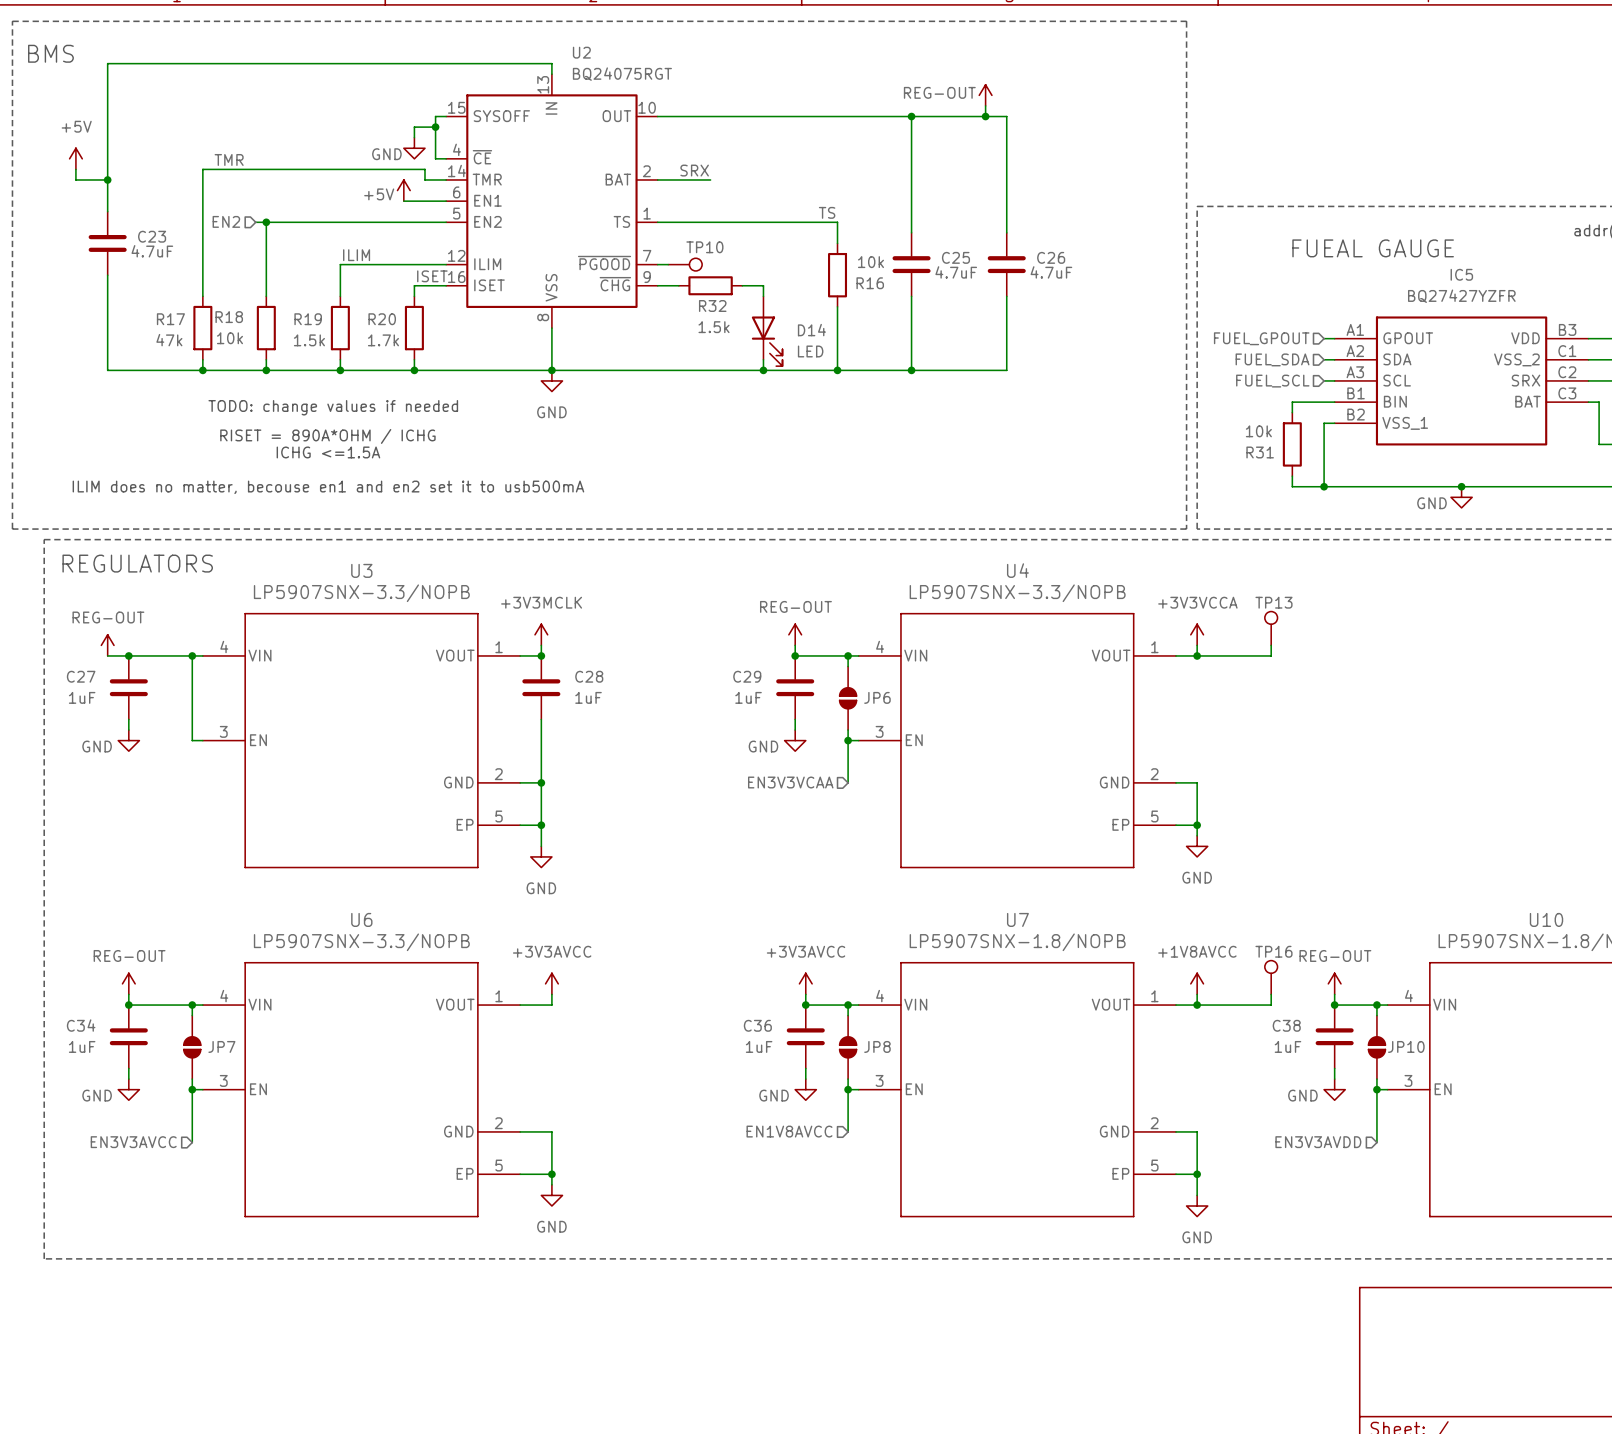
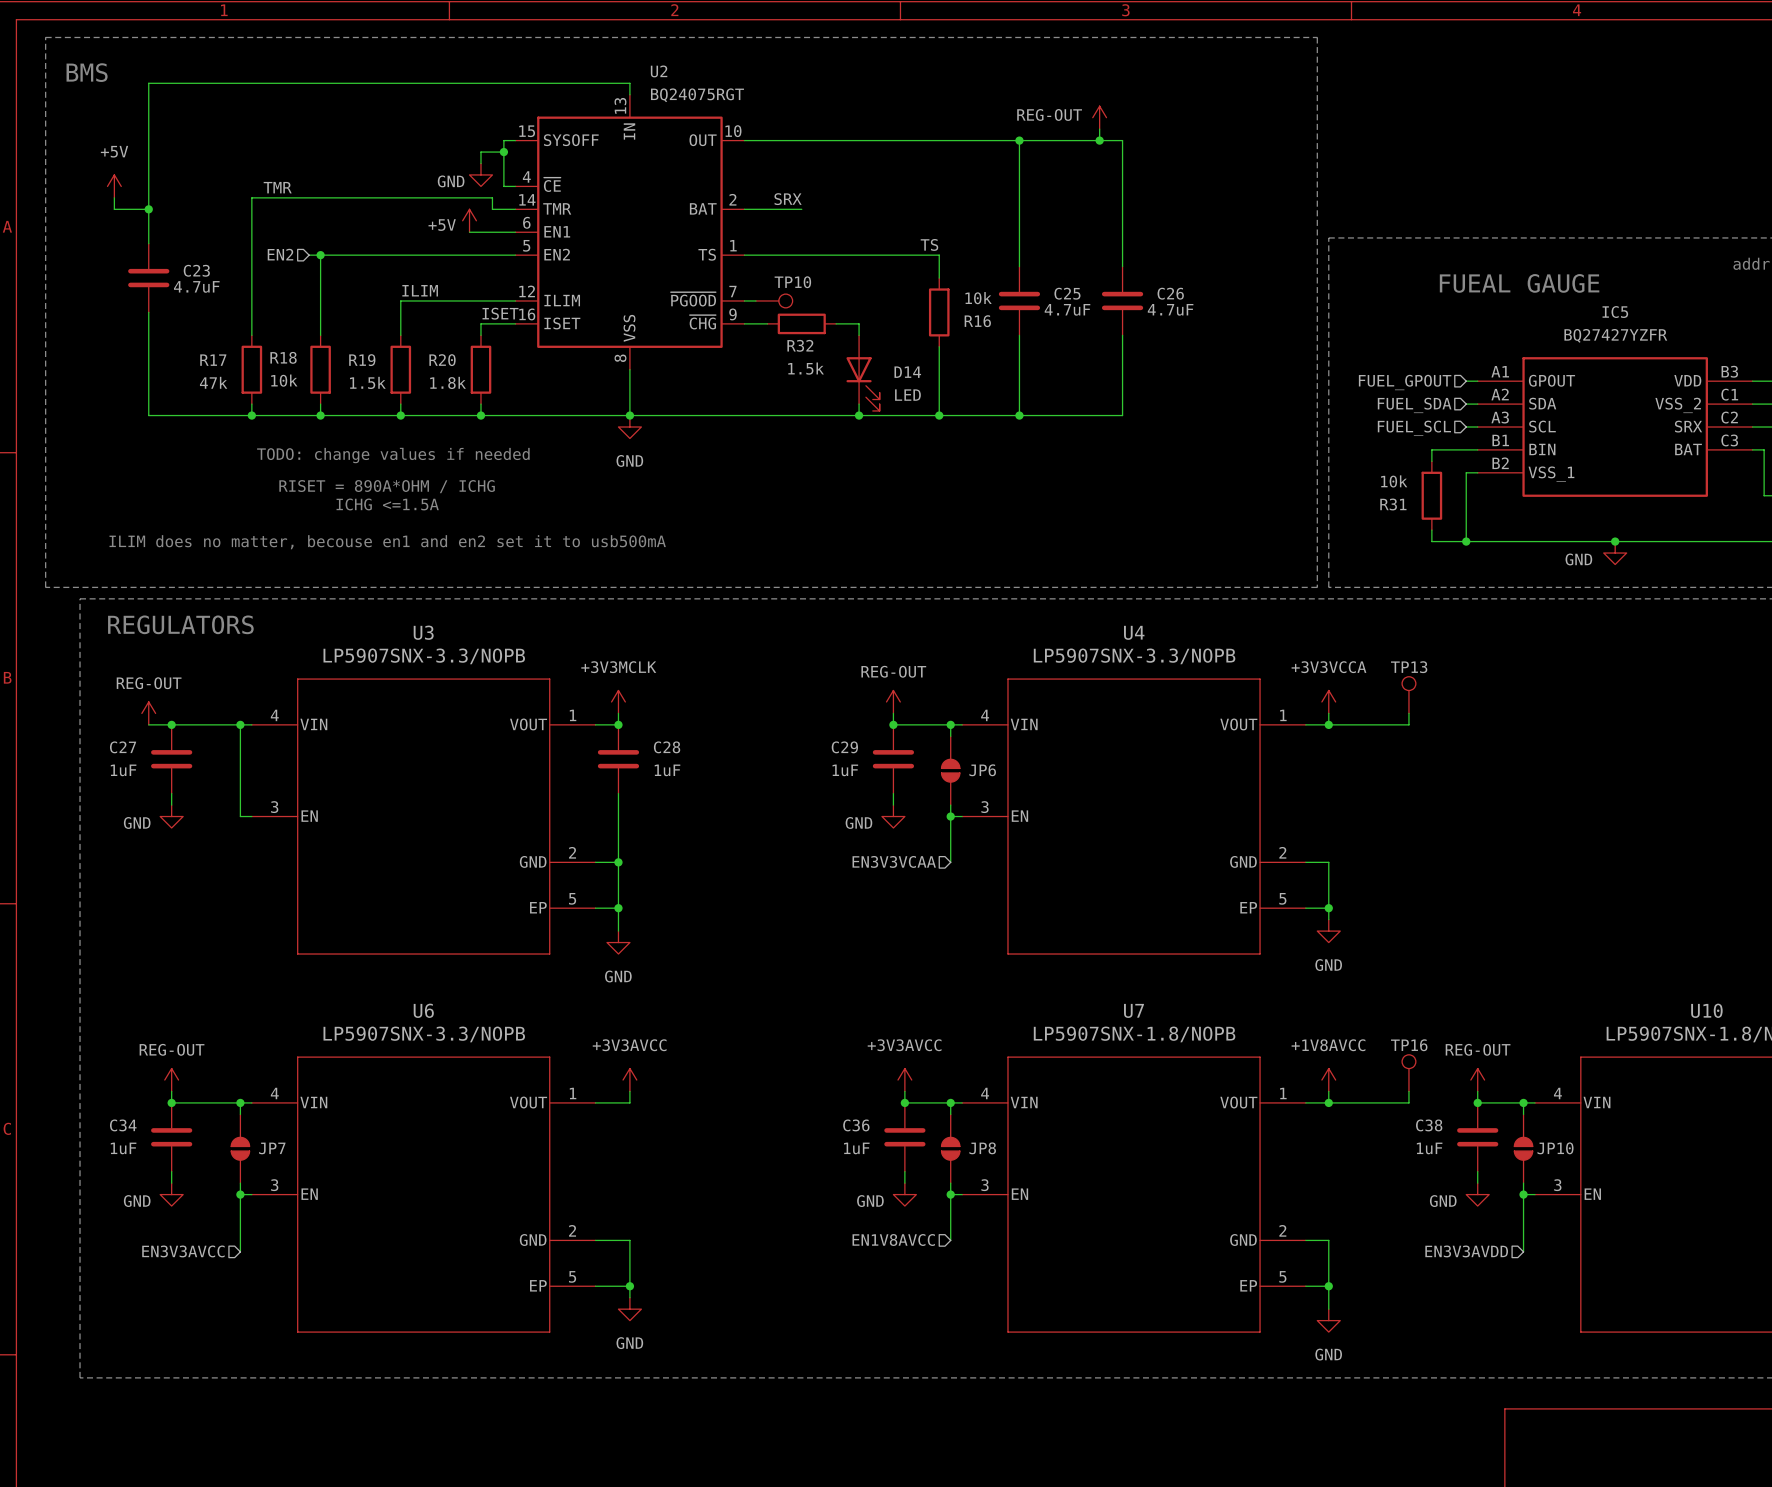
R20 value: 1.7k (383, 340) -> 1.8k (448, 382)

